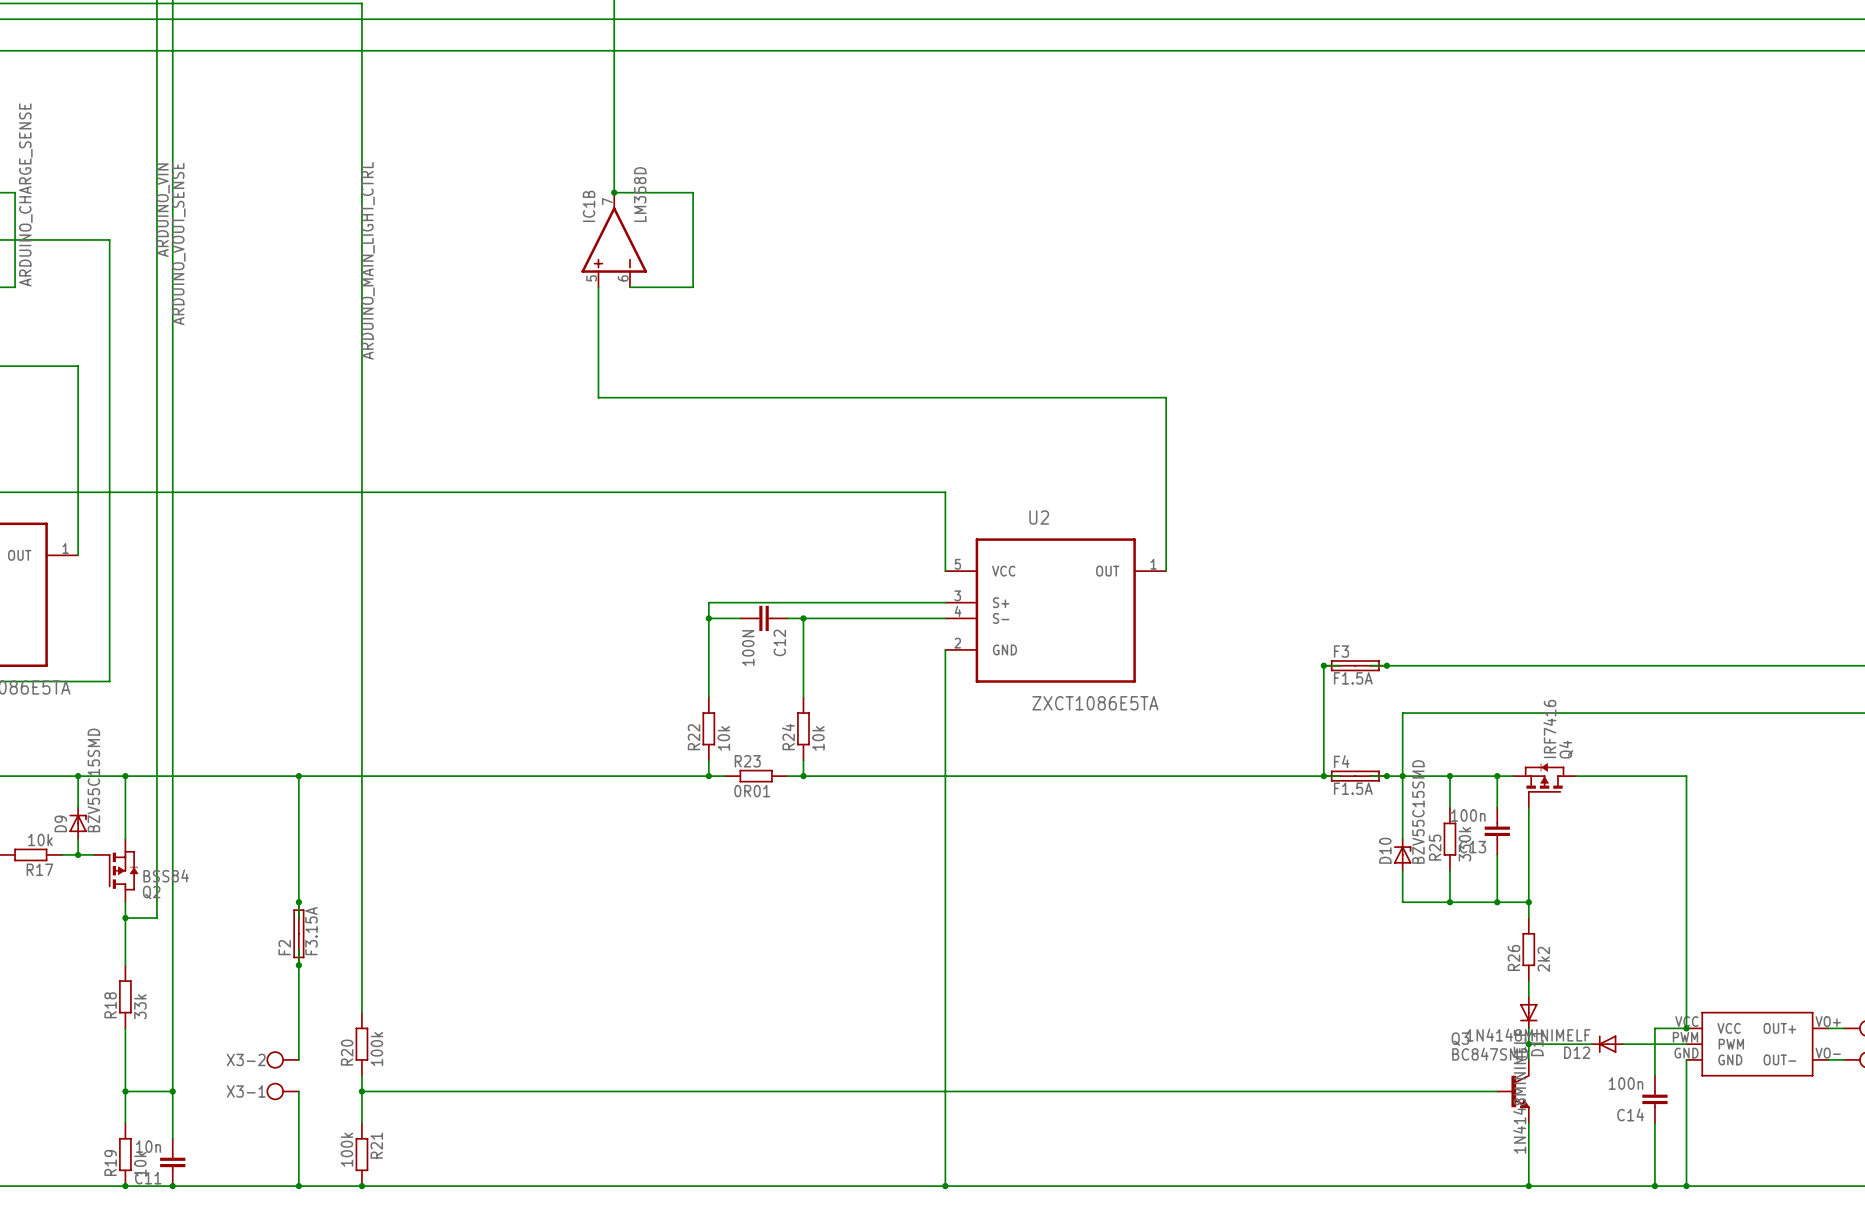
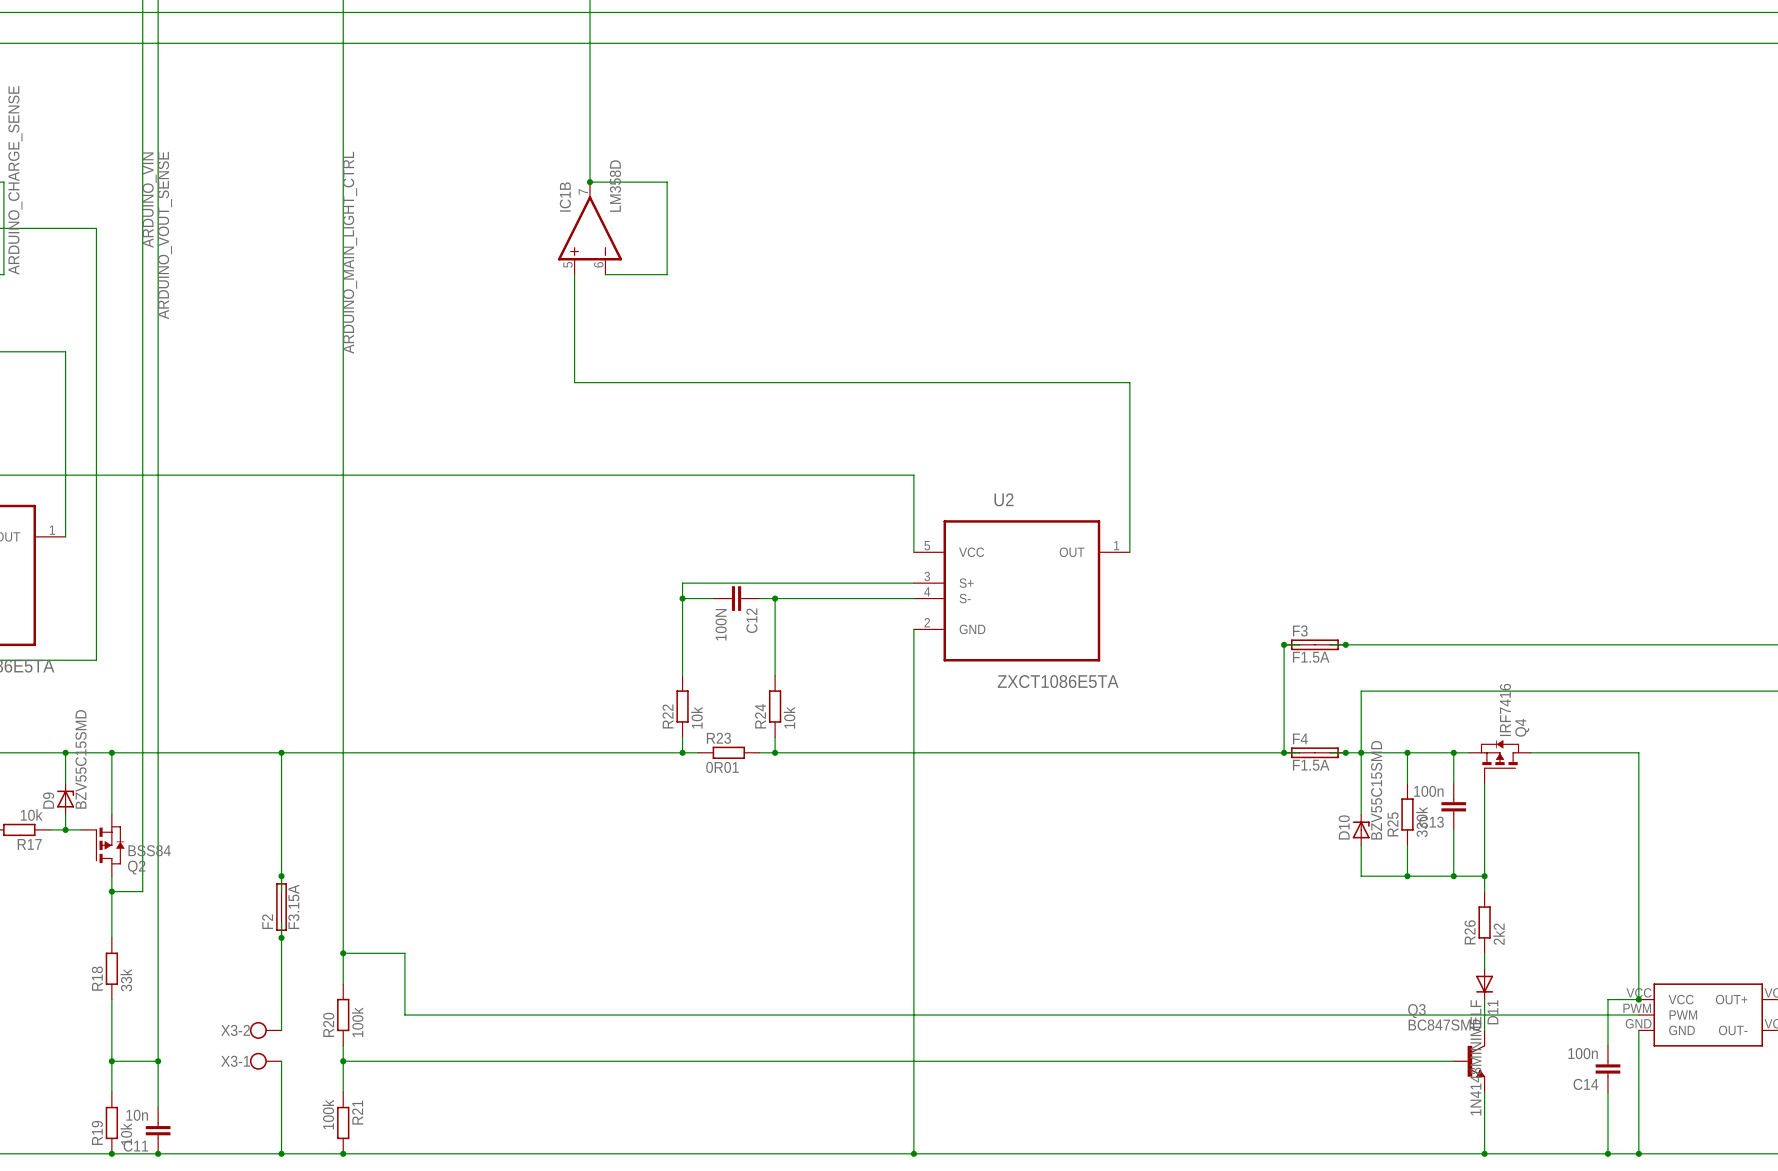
wire: none -> (343, 953) (404, 953) (404, 1015) (1484, 1015)
junction: none -> (343, 953)
junction: (1528, 1044) -> none
D12: 1N4148MINIMELF (1607, 1044) -> none

